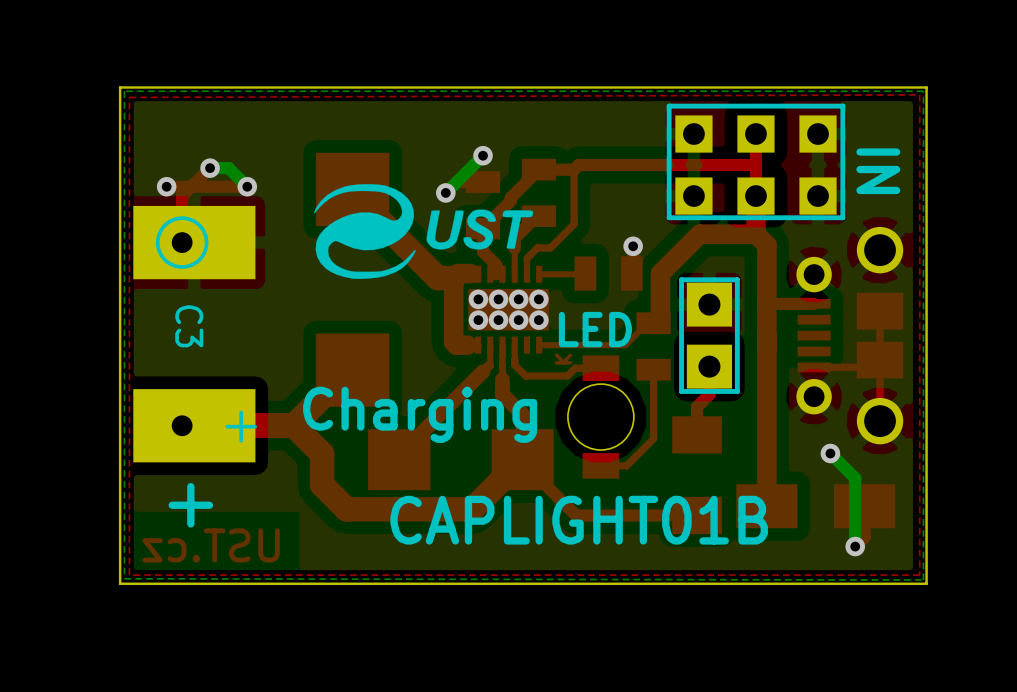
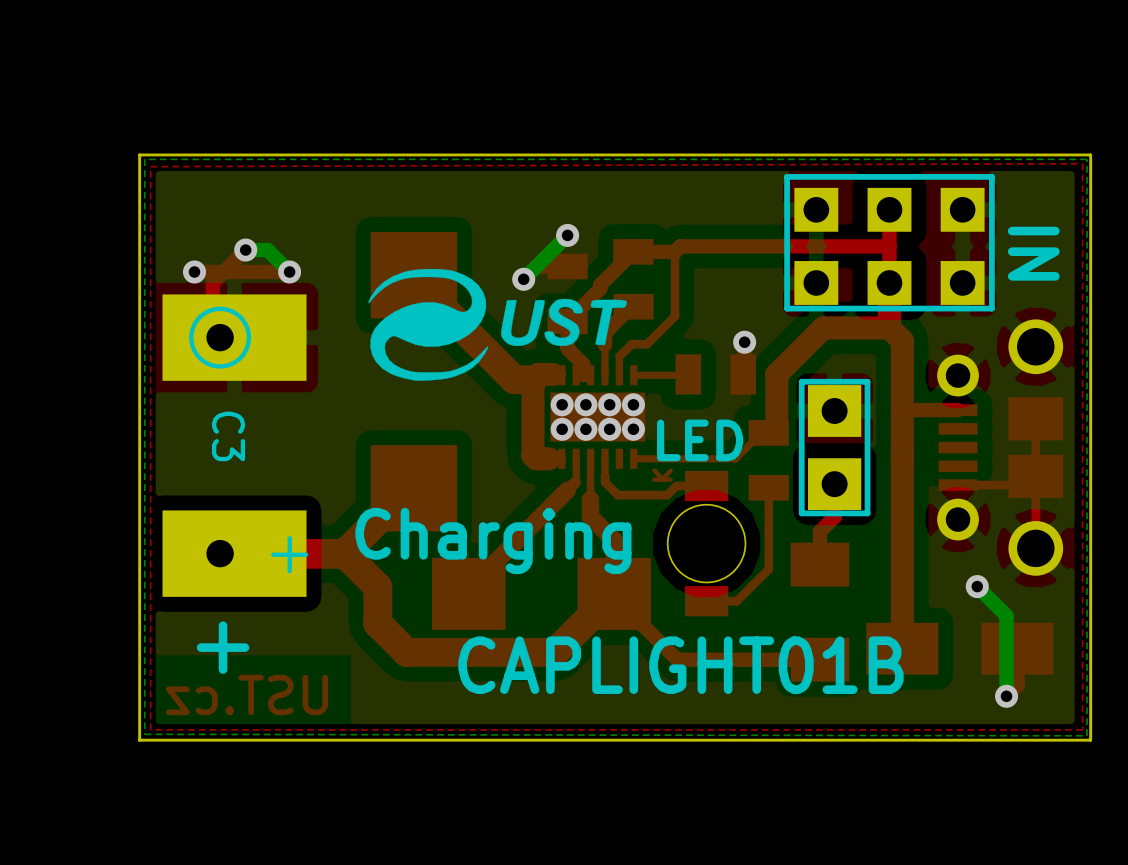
C3 footprint: [133, 205, 256, 463] -> [162, 294, 307, 597]

